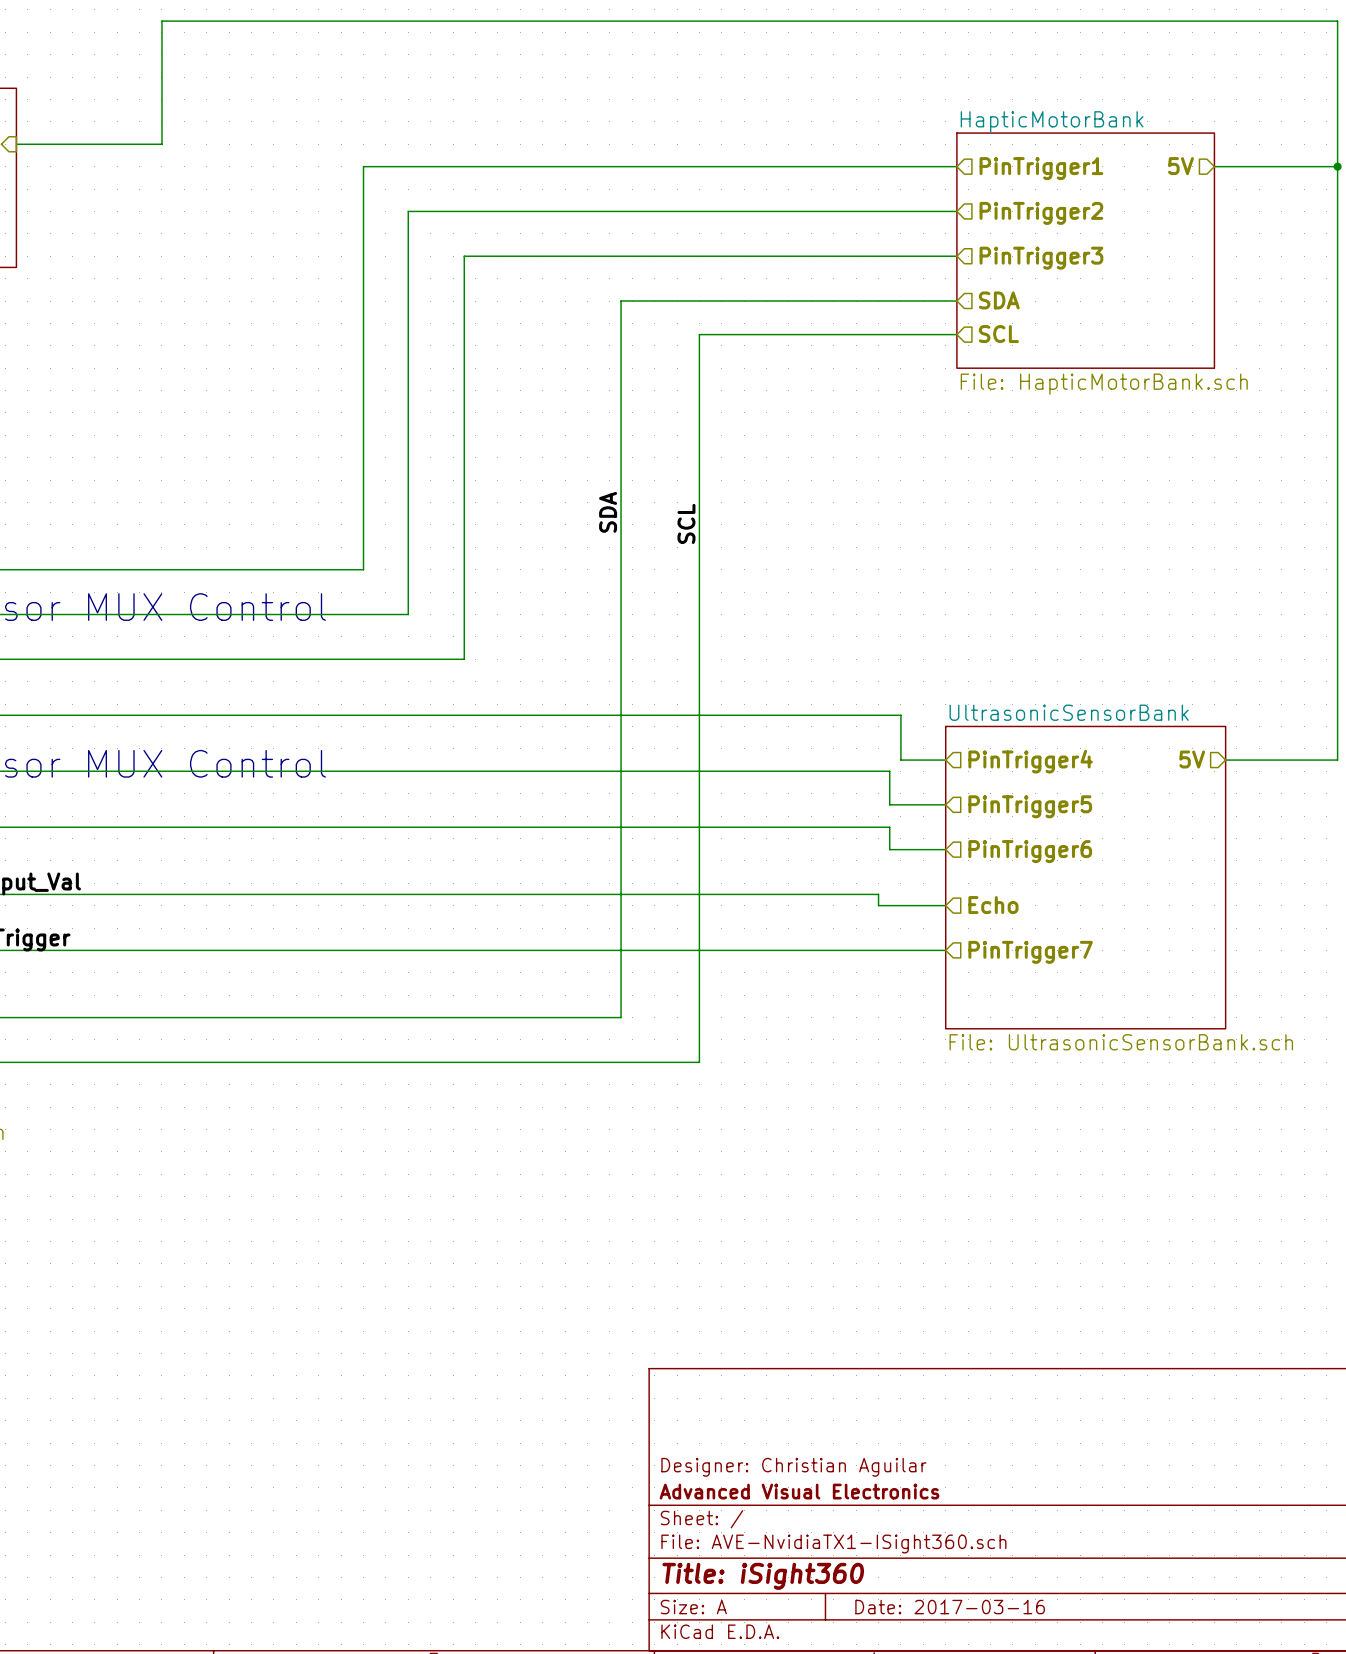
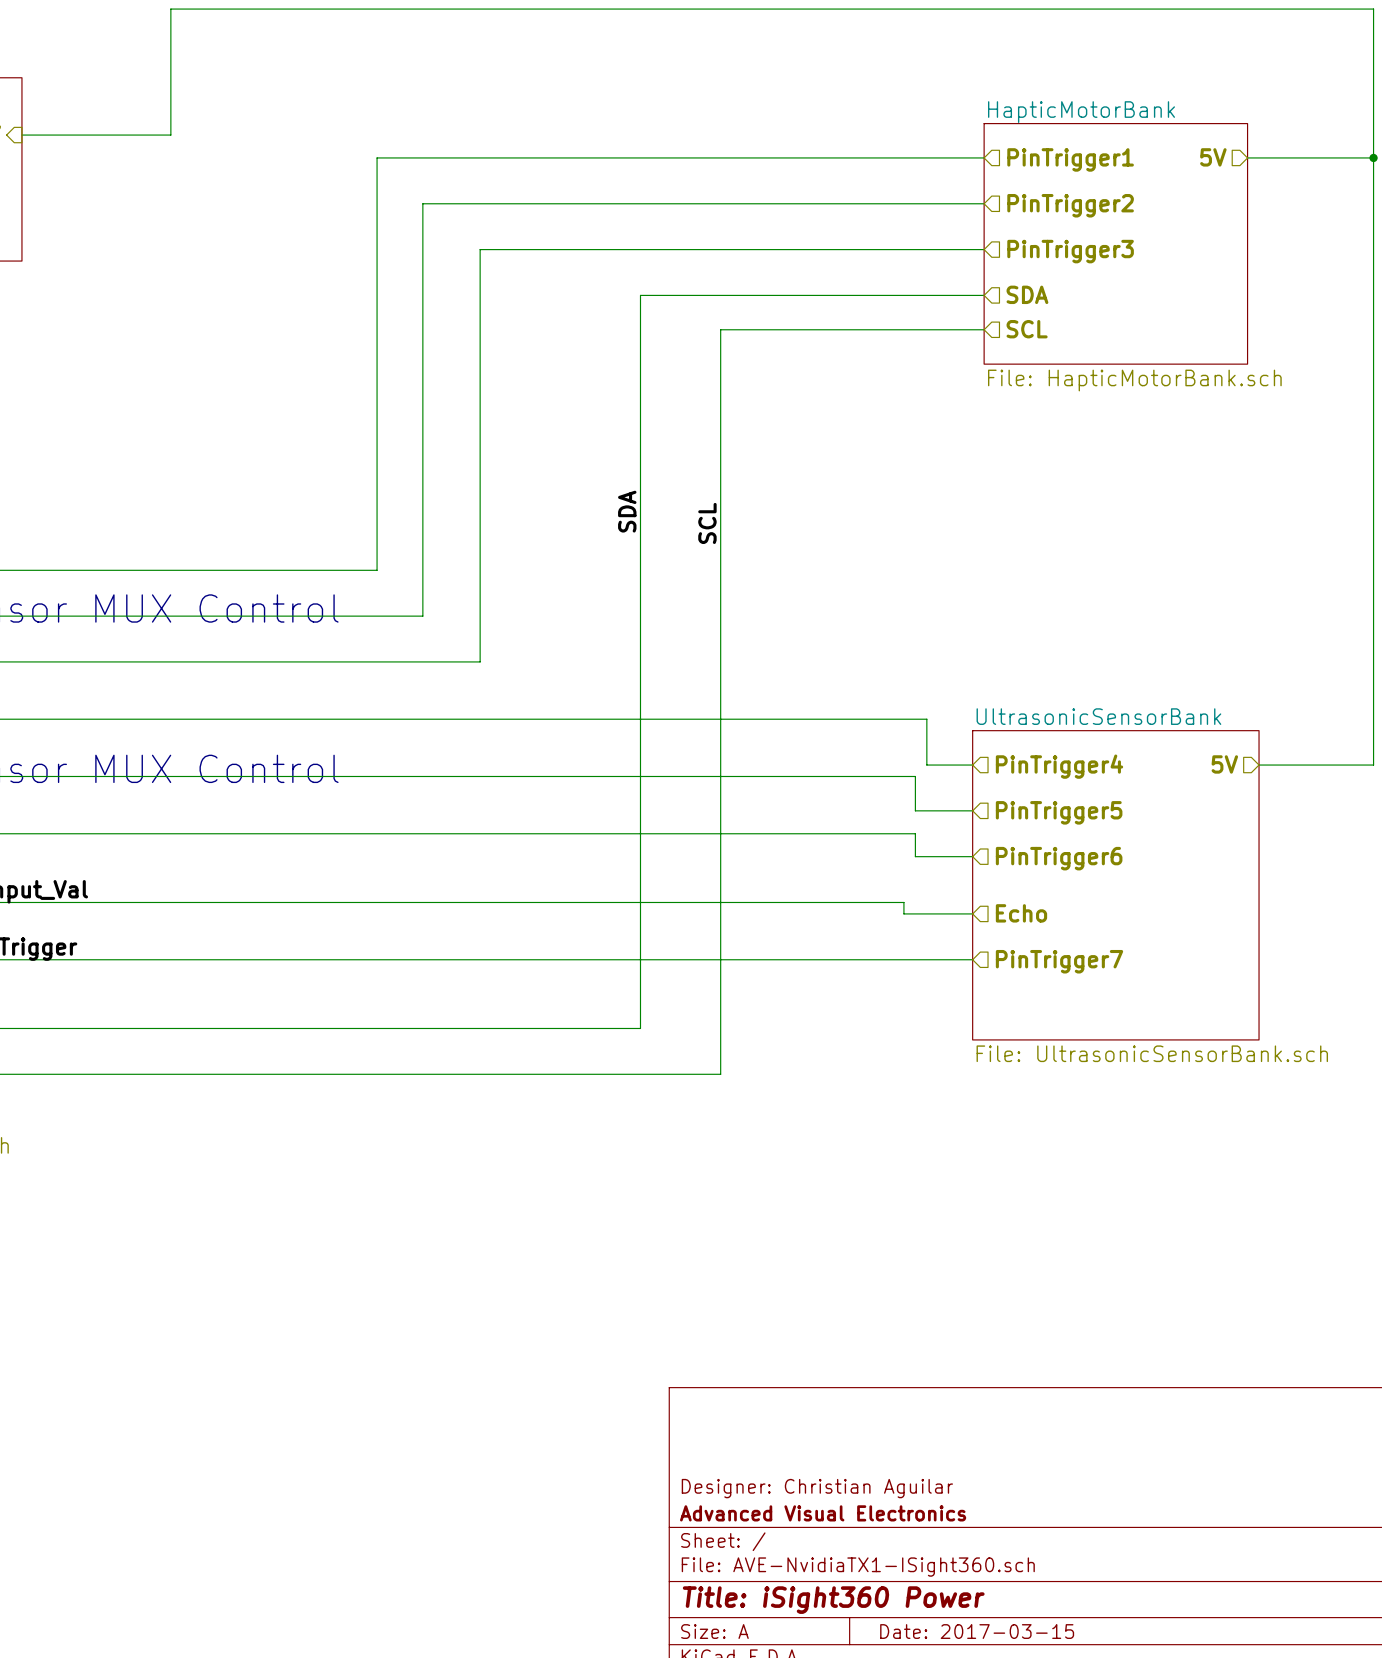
title block: Title: iSight360 (763, 1576) -> Title: iSight360 Power (833, 1600)
title block: Date: 2017-03-16 (950, 1607) -> Date: 2017-03-15 (977, 1631)

